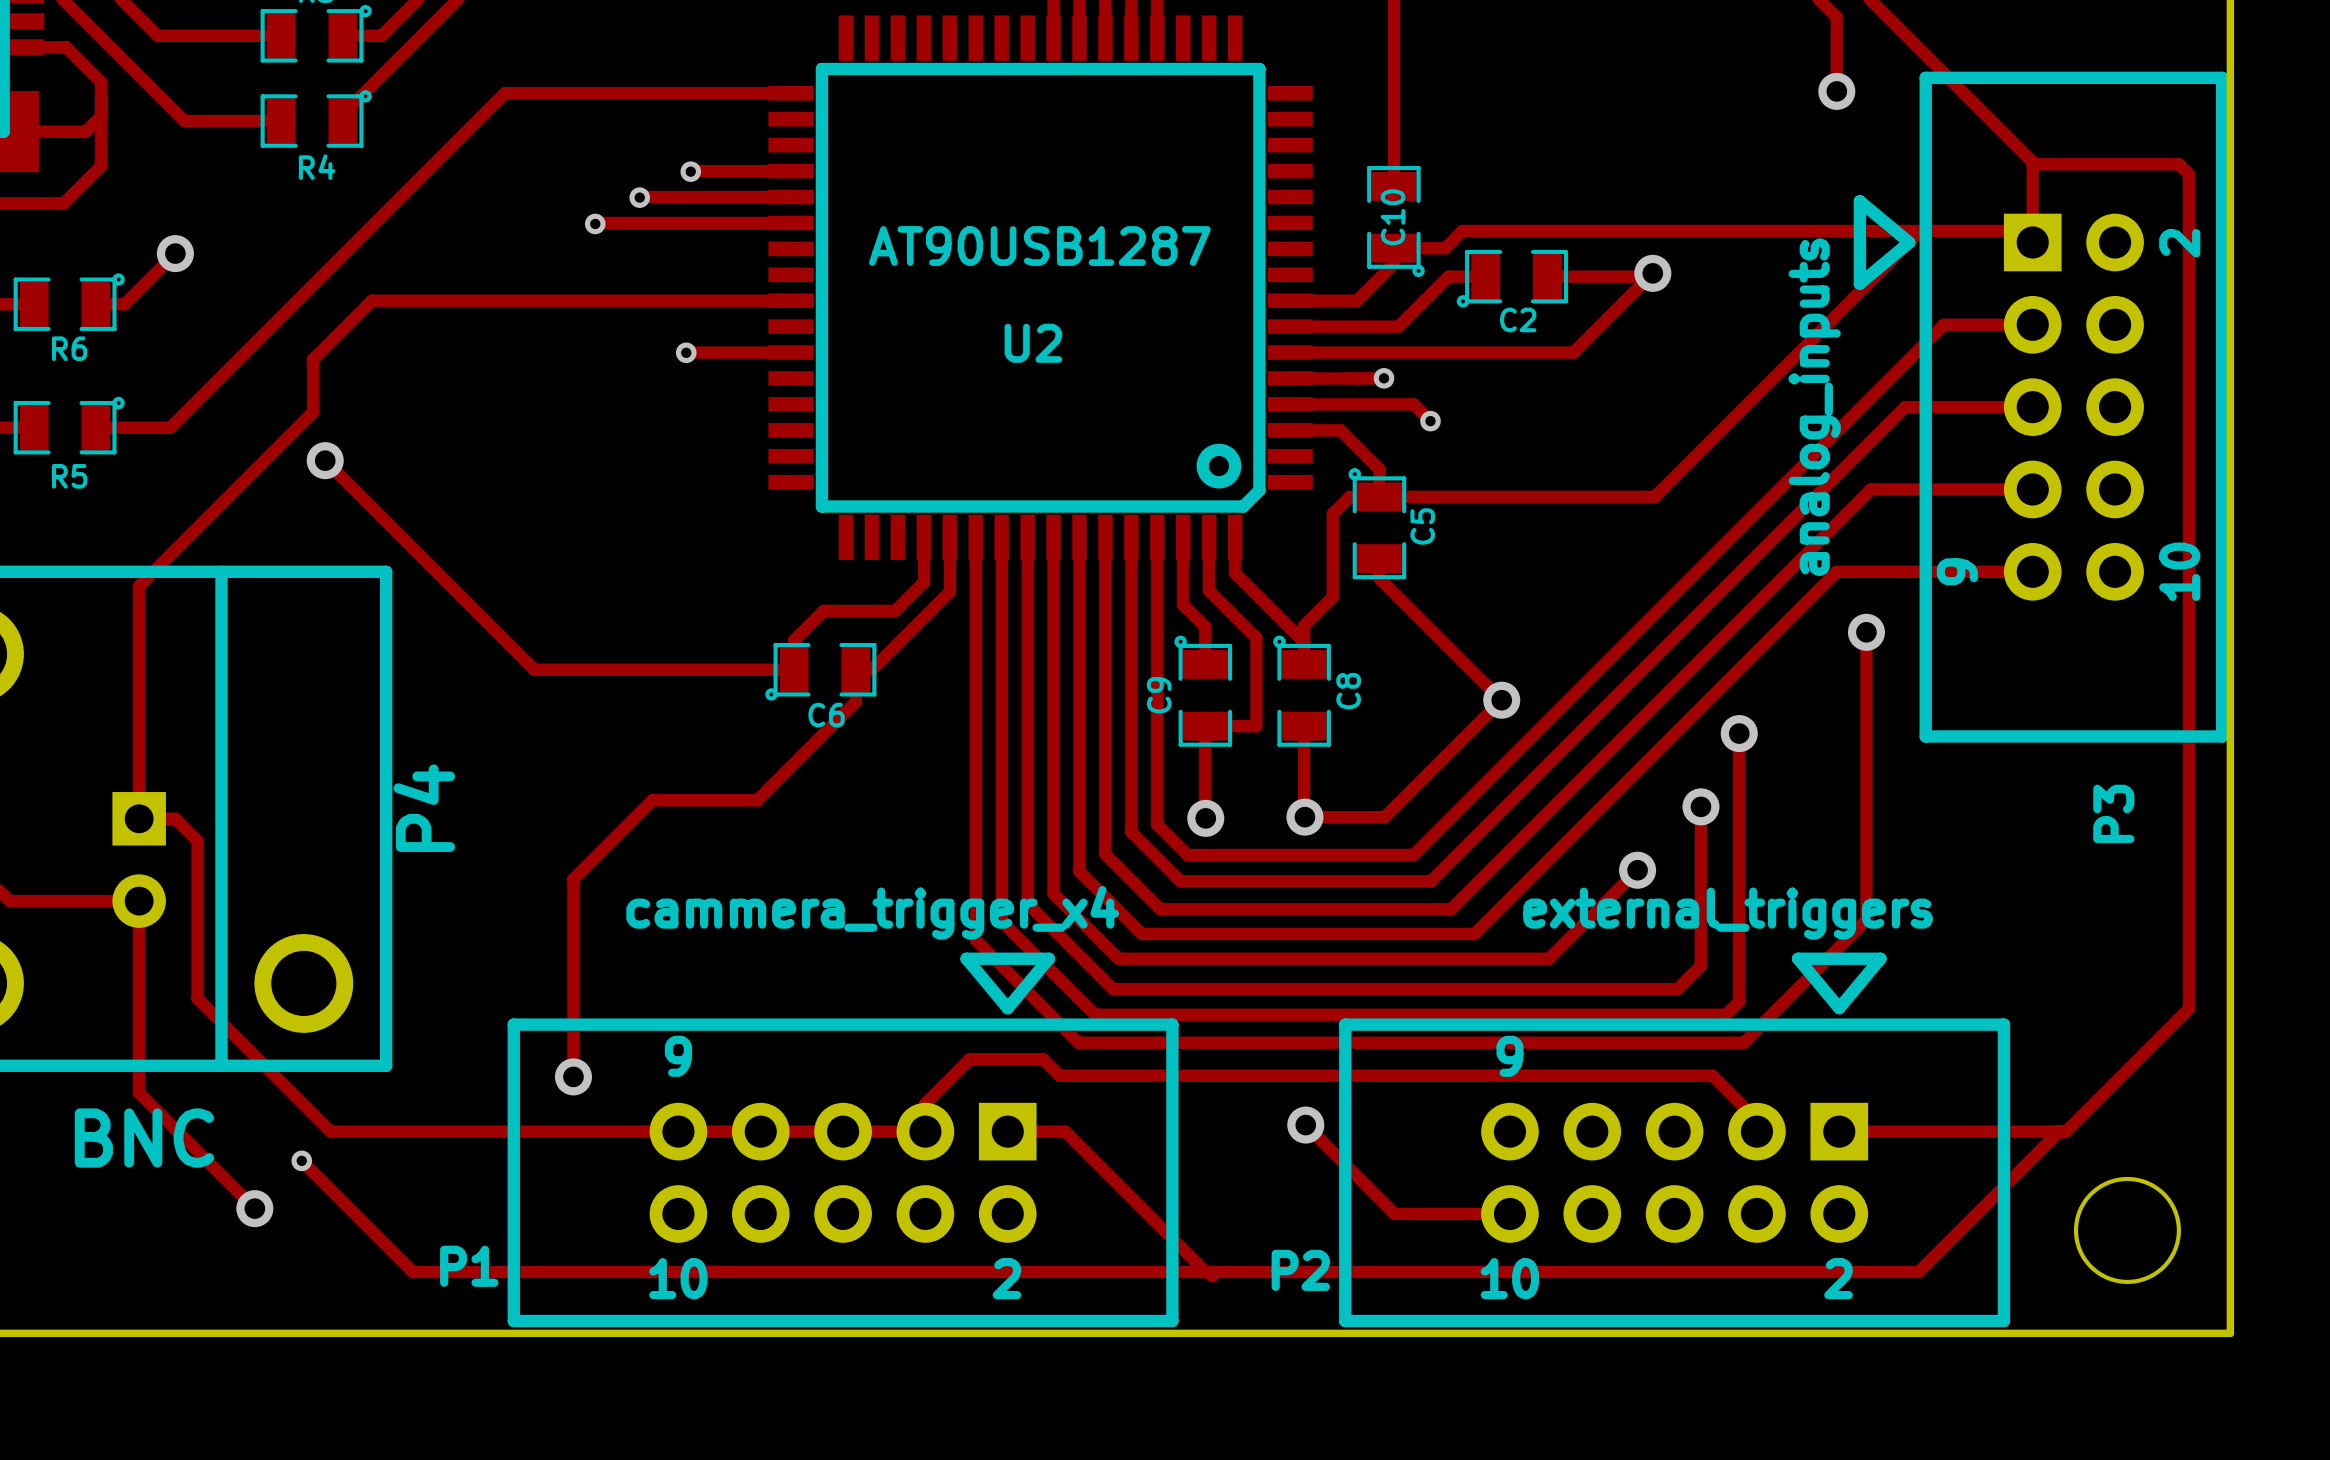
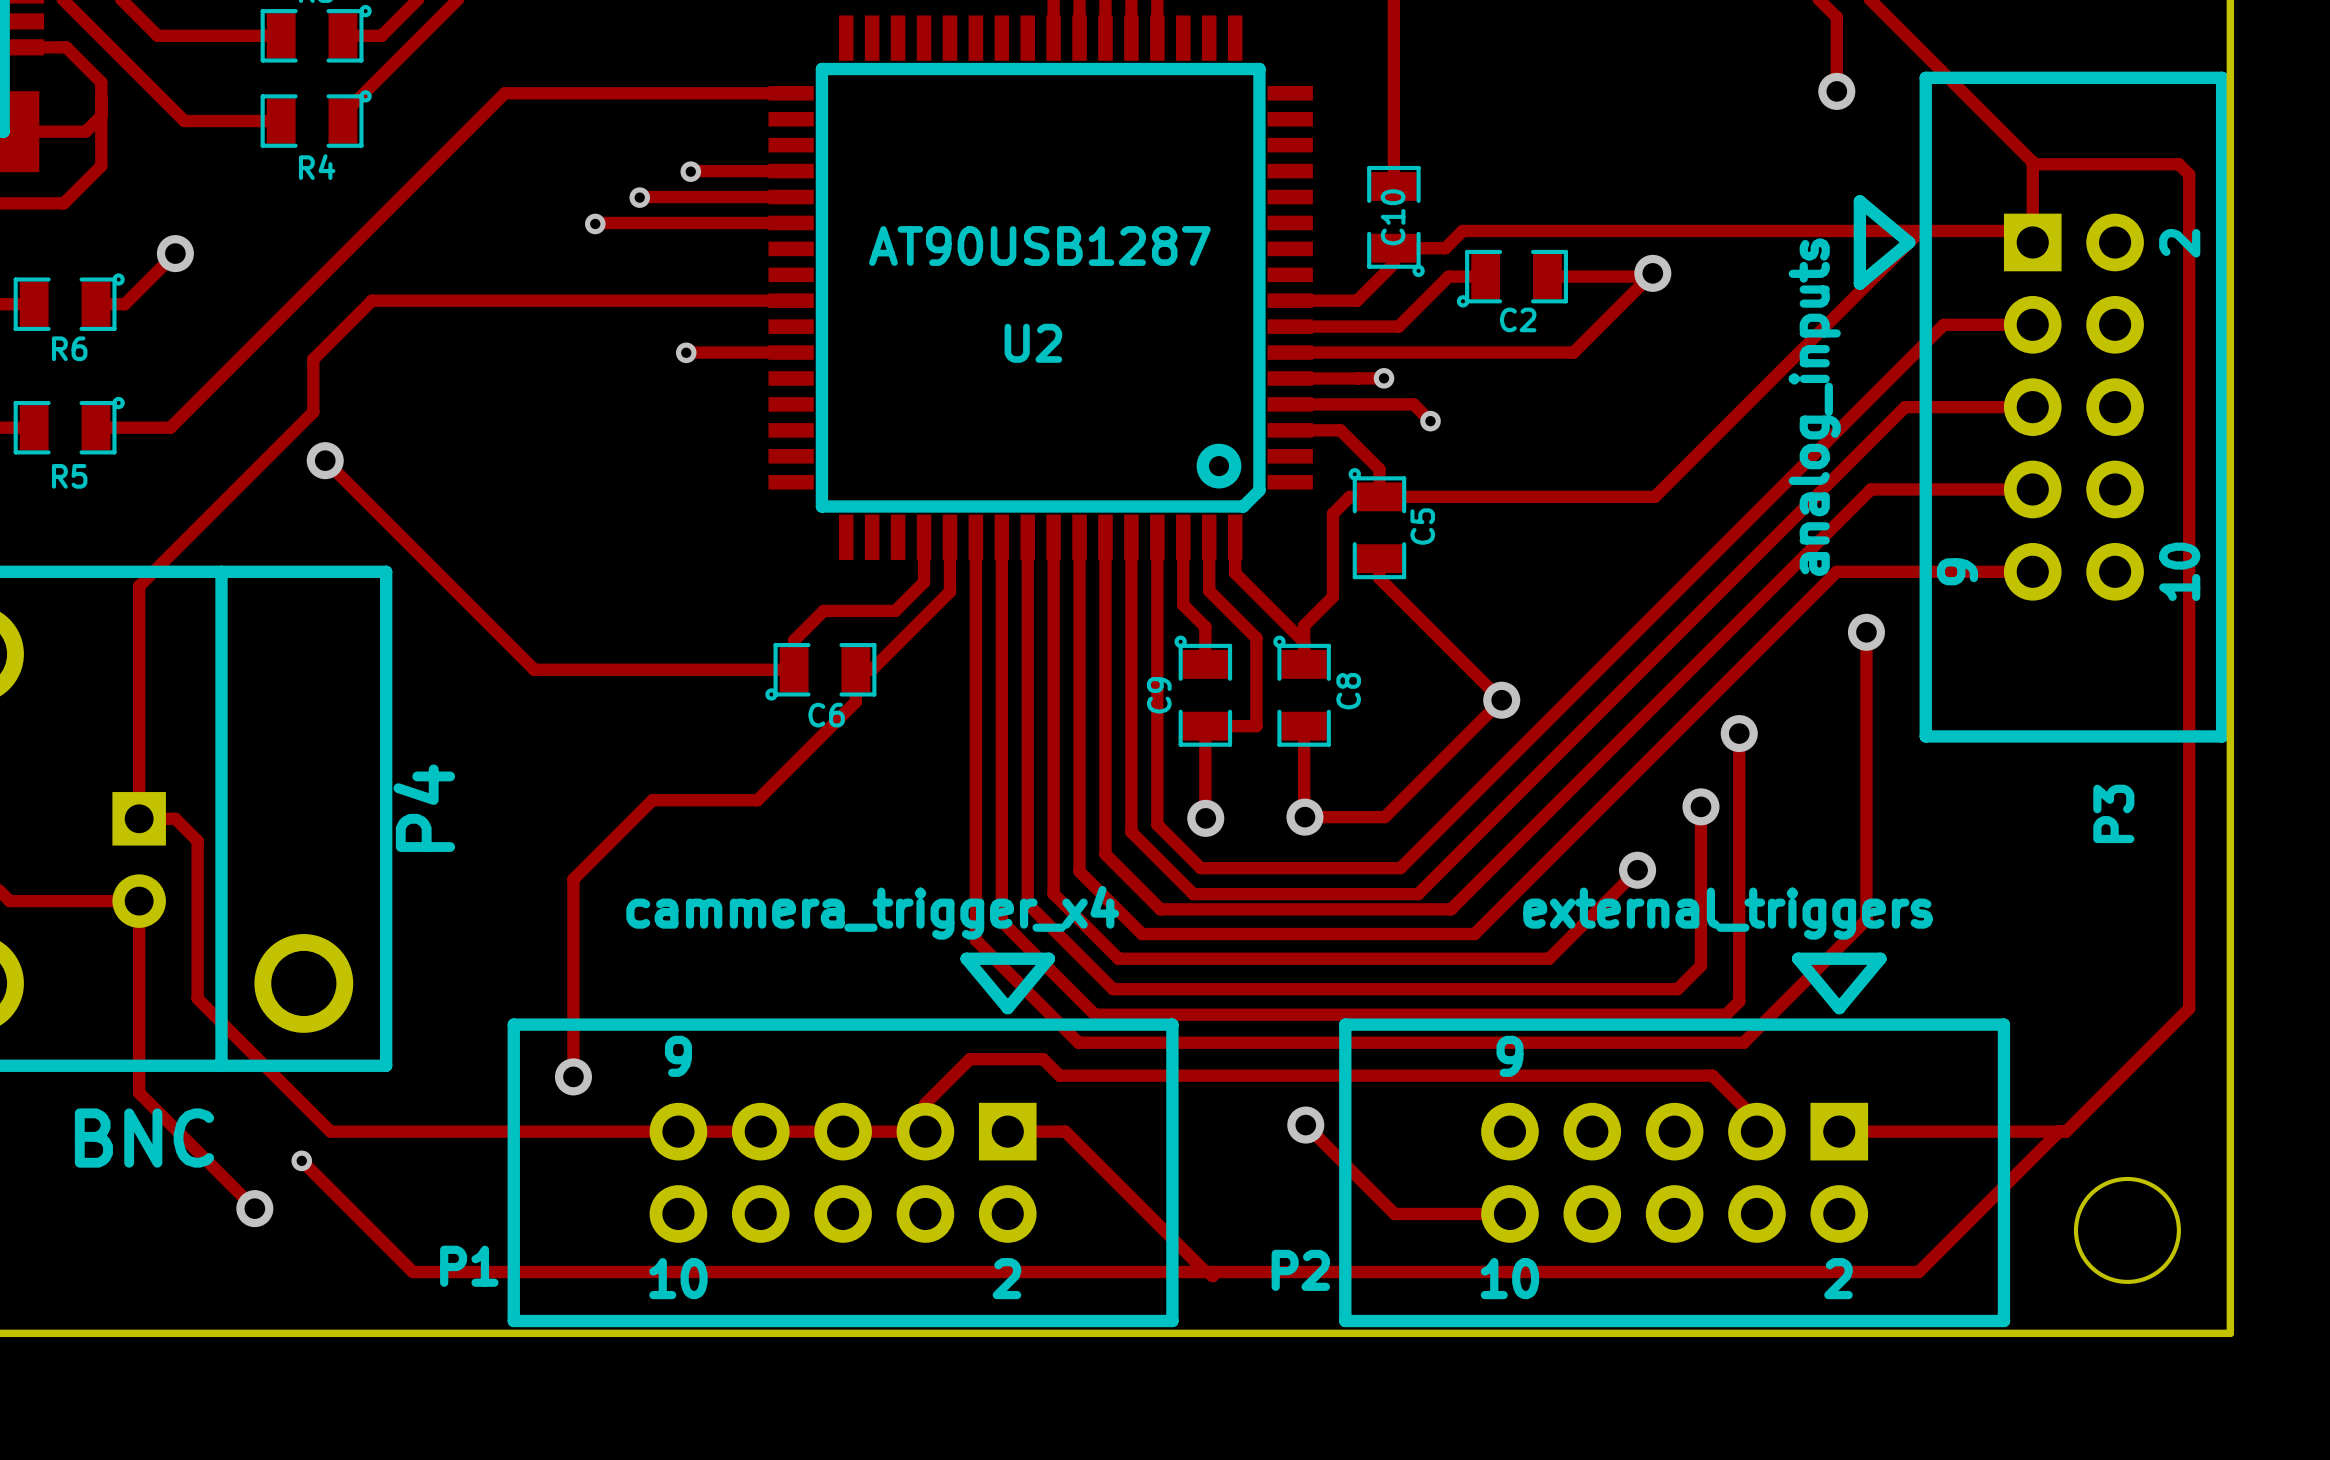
track: (1187, 855) (1413, 855) -> (1187, 855) (1200, 868) (1400, 868) (1413, 855)
track: (1180, 881) (1430, 881) -> (1180, 881) (1193, 894) (1418, 894) (1430, 881)

